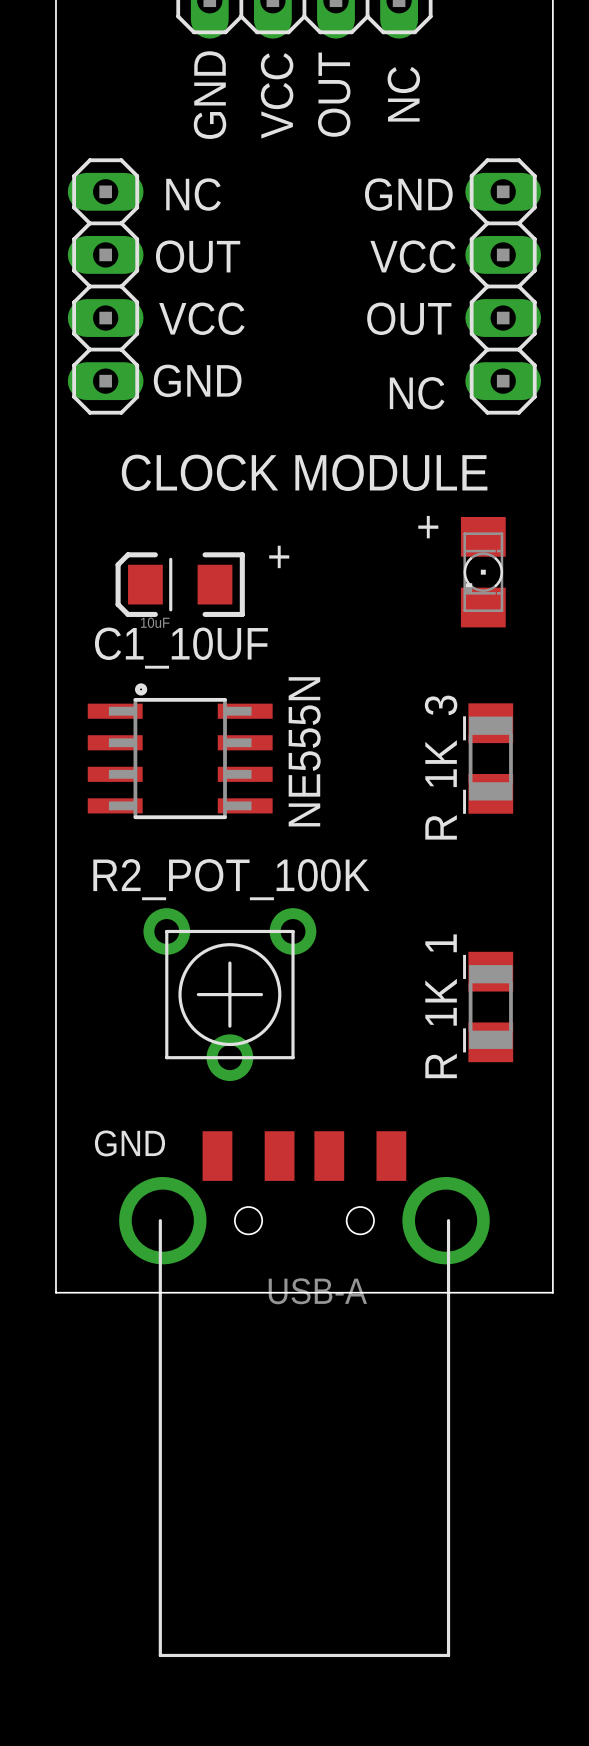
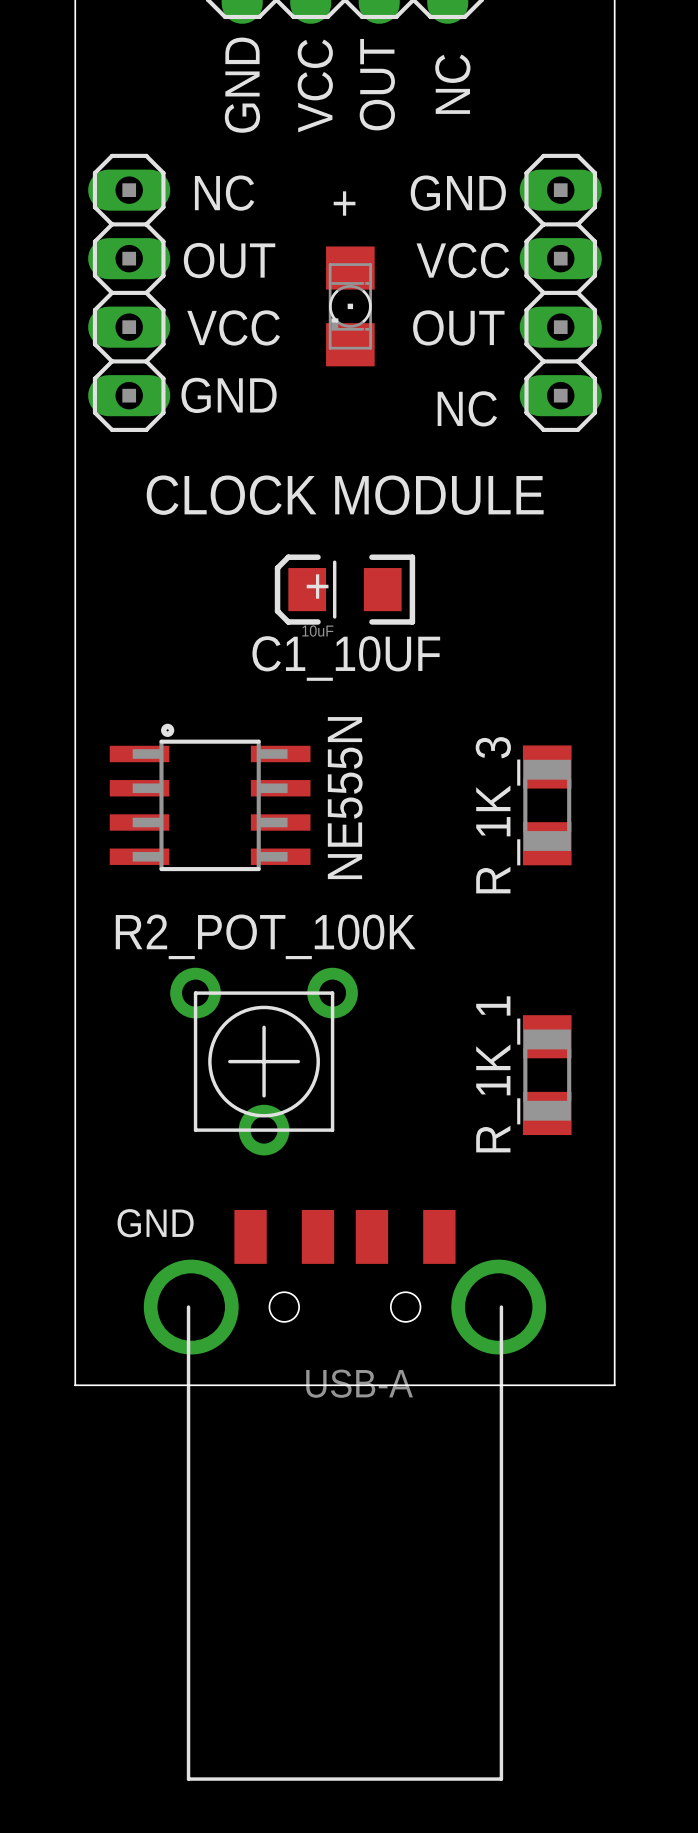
text position: + (428, 527) -> + (344, 203)
part position: (483, 572) -> (350, 306)
C1_10UF position: (180, 584) -> (344, 589)

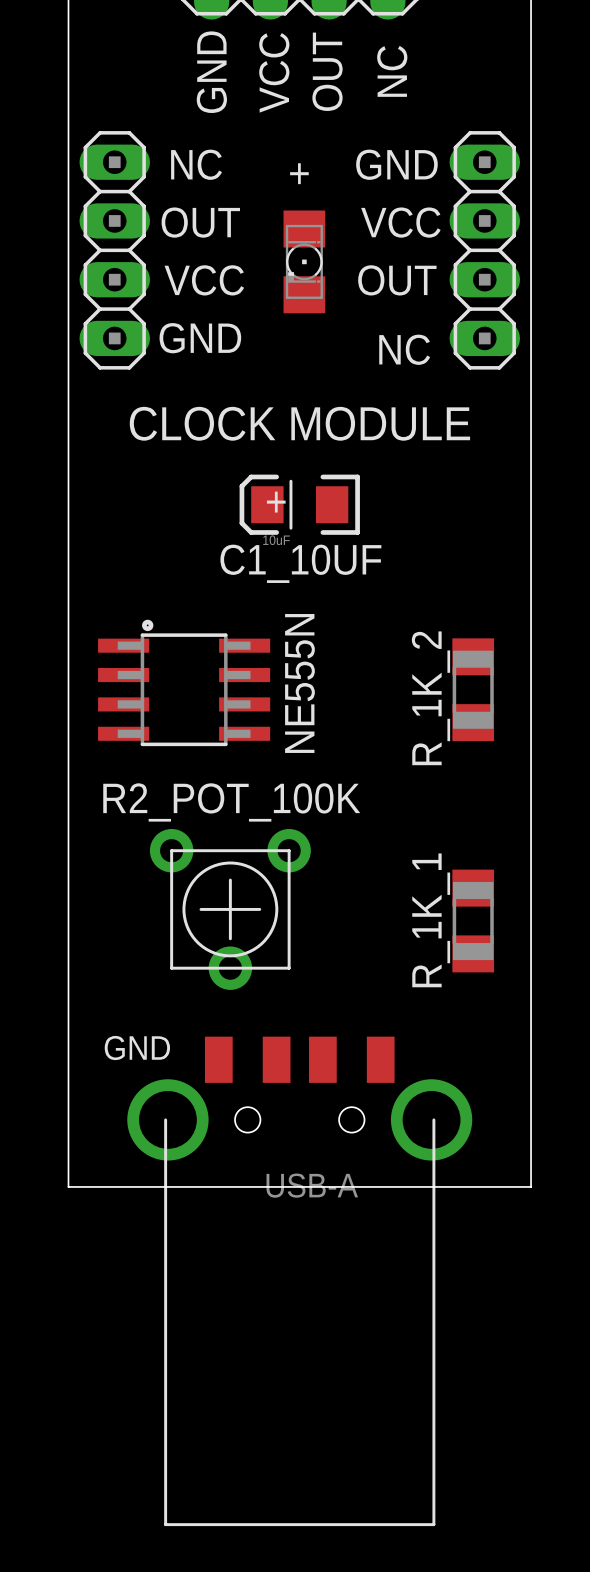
R_1K_3 name: R_1K_3 (498, 815) -> R_1K_2 (430, 698)

